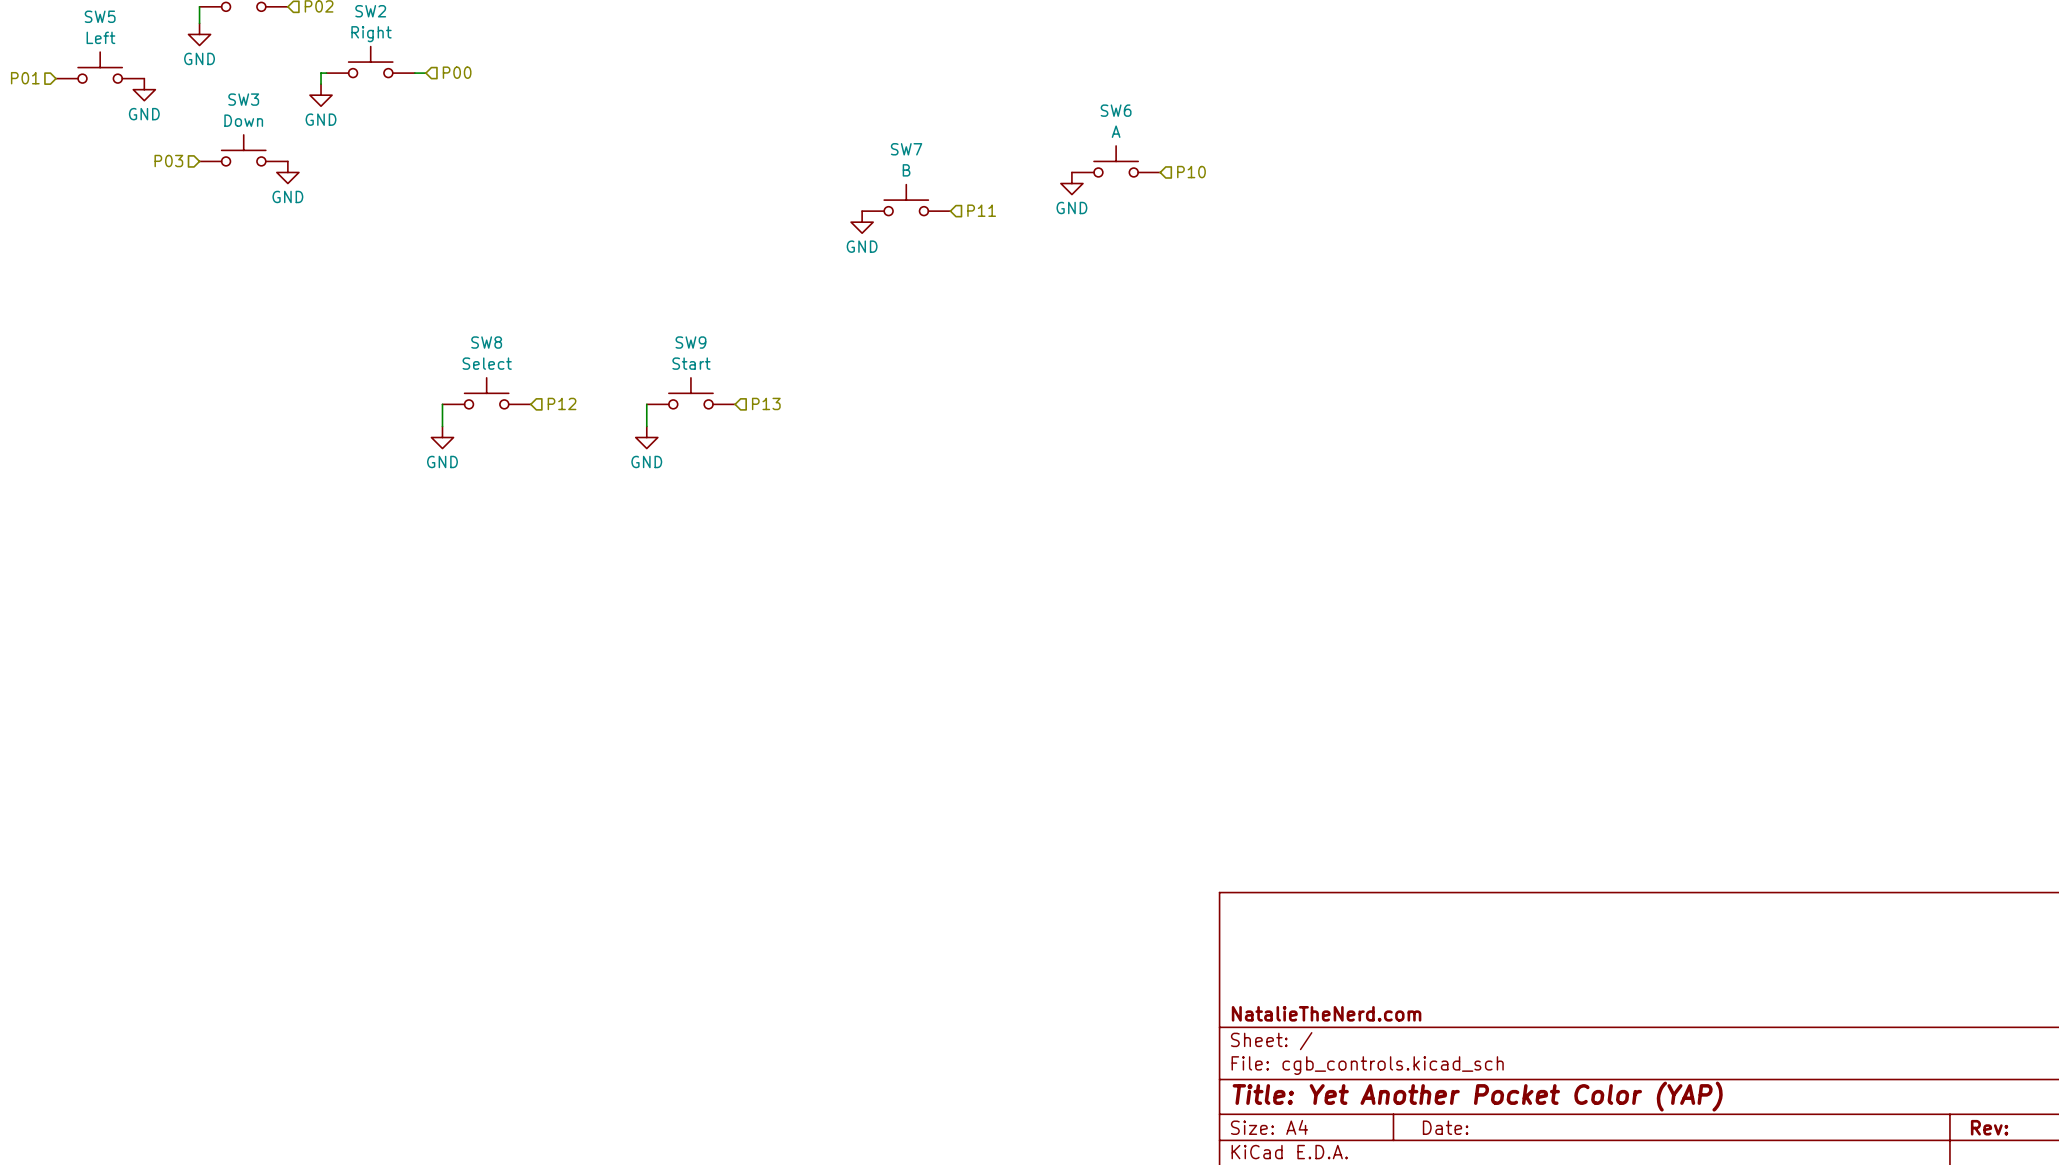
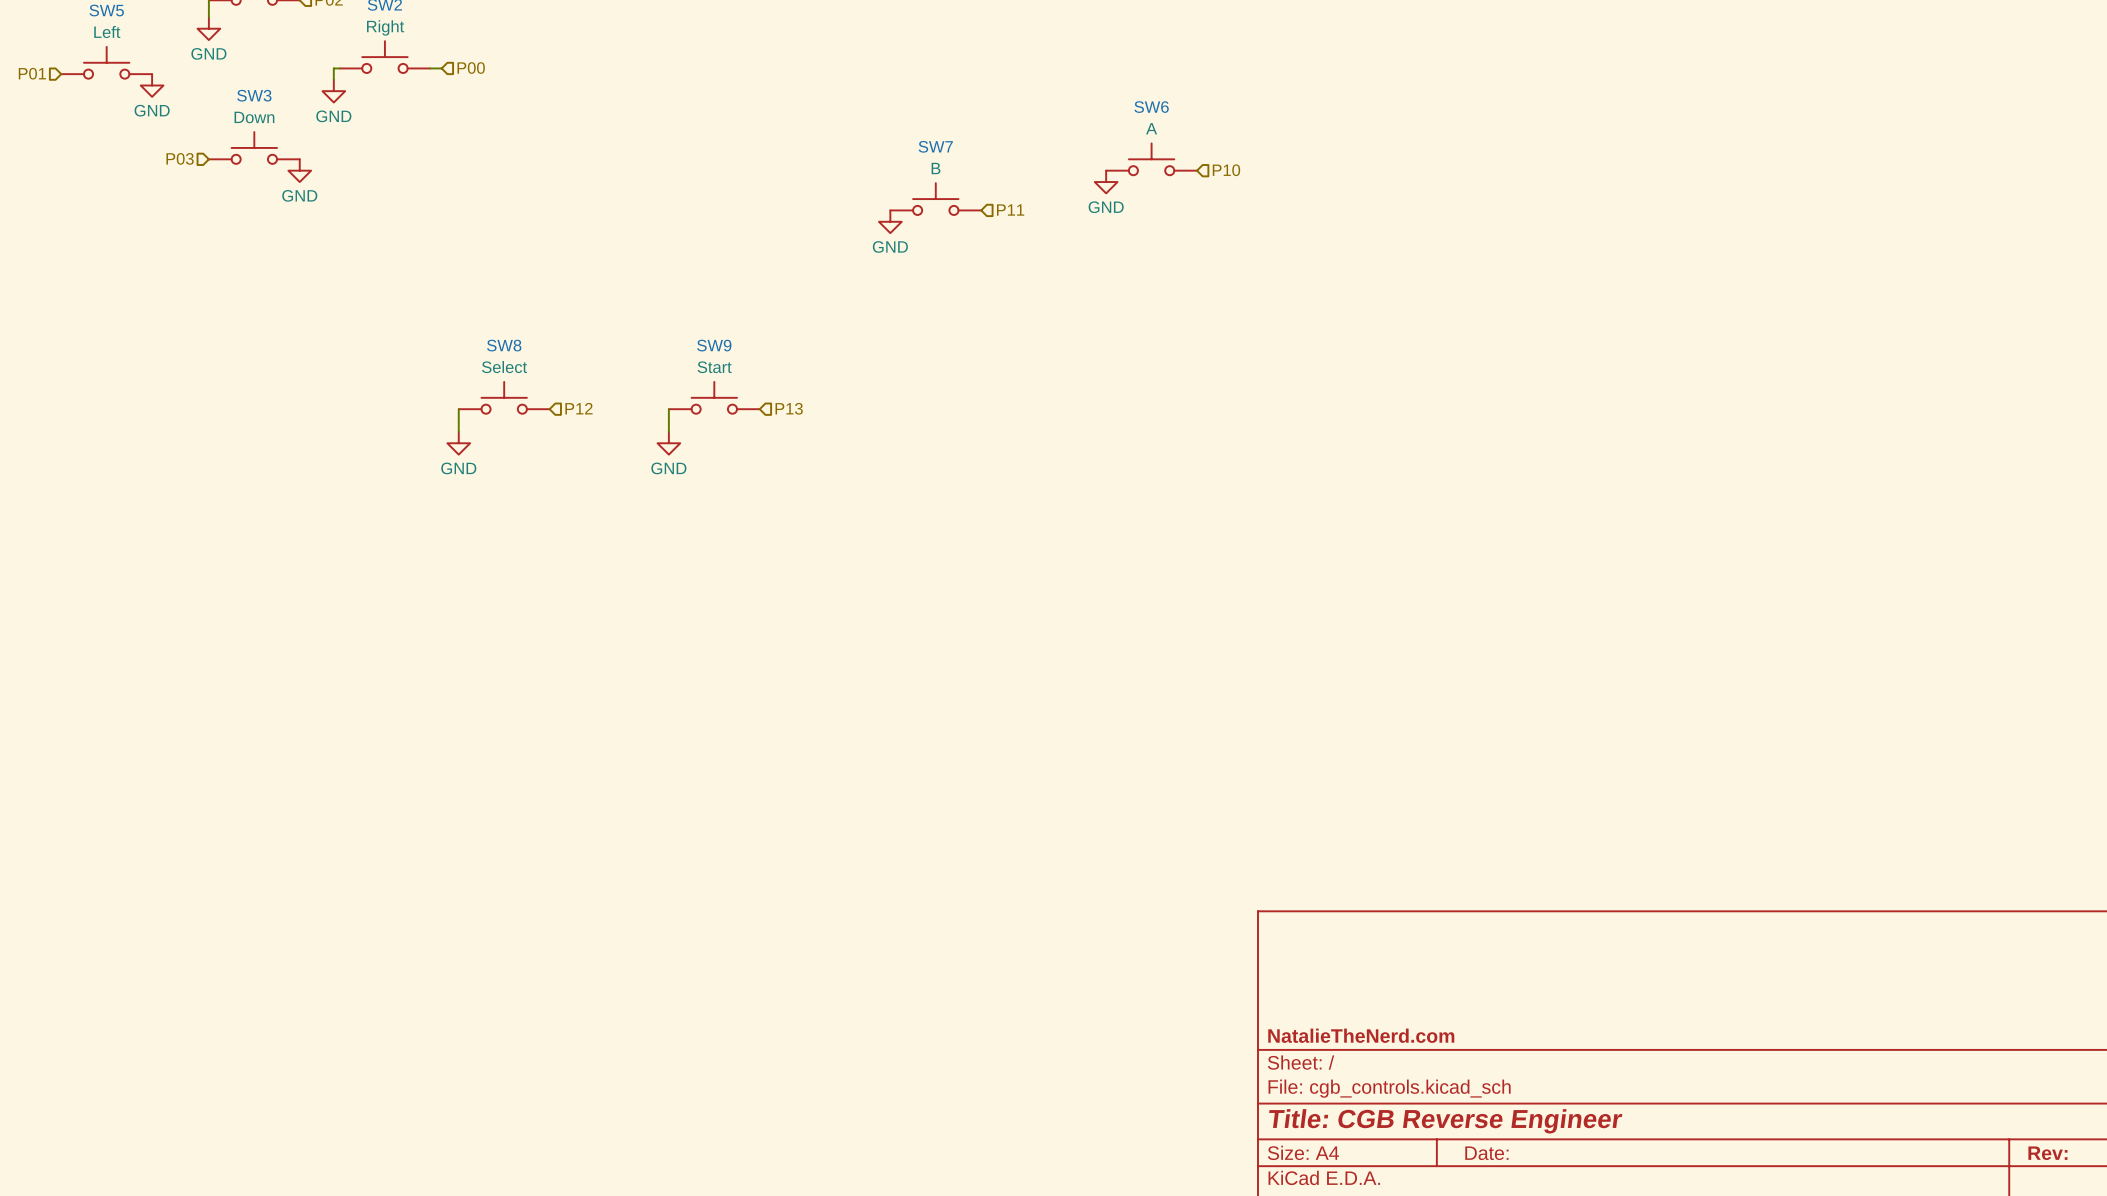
title block: Title: Yet Another Pocket Color (YAP) (1477, 1096) -> Title: CGB Reverse Engineer (1445, 1121)

